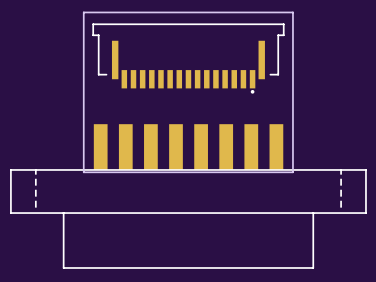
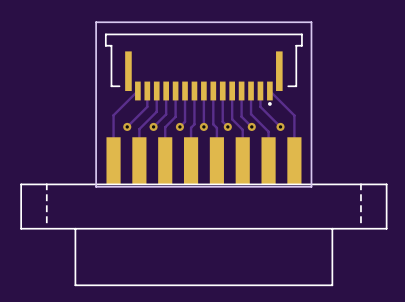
track: none -> (137, 90) (113, 115) (113, 160)
track: none -> (147, 90) (147, 106) (127, 126)
track: none -> (156, 90) (156, 111) (139, 129) (139, 160)
track: none -> (166, 90) (166, 114) (153, 126)
track: none -> (175, 90) (175, 116) (165, 127) (165, 160)
track: none -> (185, 90) (185, 121) (179, 126)
track: none -> (194, 90) (194, 124) (191, 127) (191, 160)
track: none -> (203, 90) (203, 126)
track: none -> (213, 90) (213, 124) (216, 127) (216, 160)
track: none -> (222, 90) (222, 121) (227, 126)
track: none -> (232, 90) (232, 119) (242, 129) (242, 160)
track: none -> (241, 90) (241, 116) (251, 126)
track: none -> (251, 90) (251, 114) (268, 131) (268, 160)
track: none -> (260, 90) (260, 106) (280, 126)
track: none -> (269, 90) (294, 115) (294, 160)
via: none -> (127, 126)
via: none -> (153, 126)
via: none -> (179, 126)
via: none -> (203, 126)
via: none -> (227, 126)
via: none -> (251, 126)
via: none -> (280, 126)

